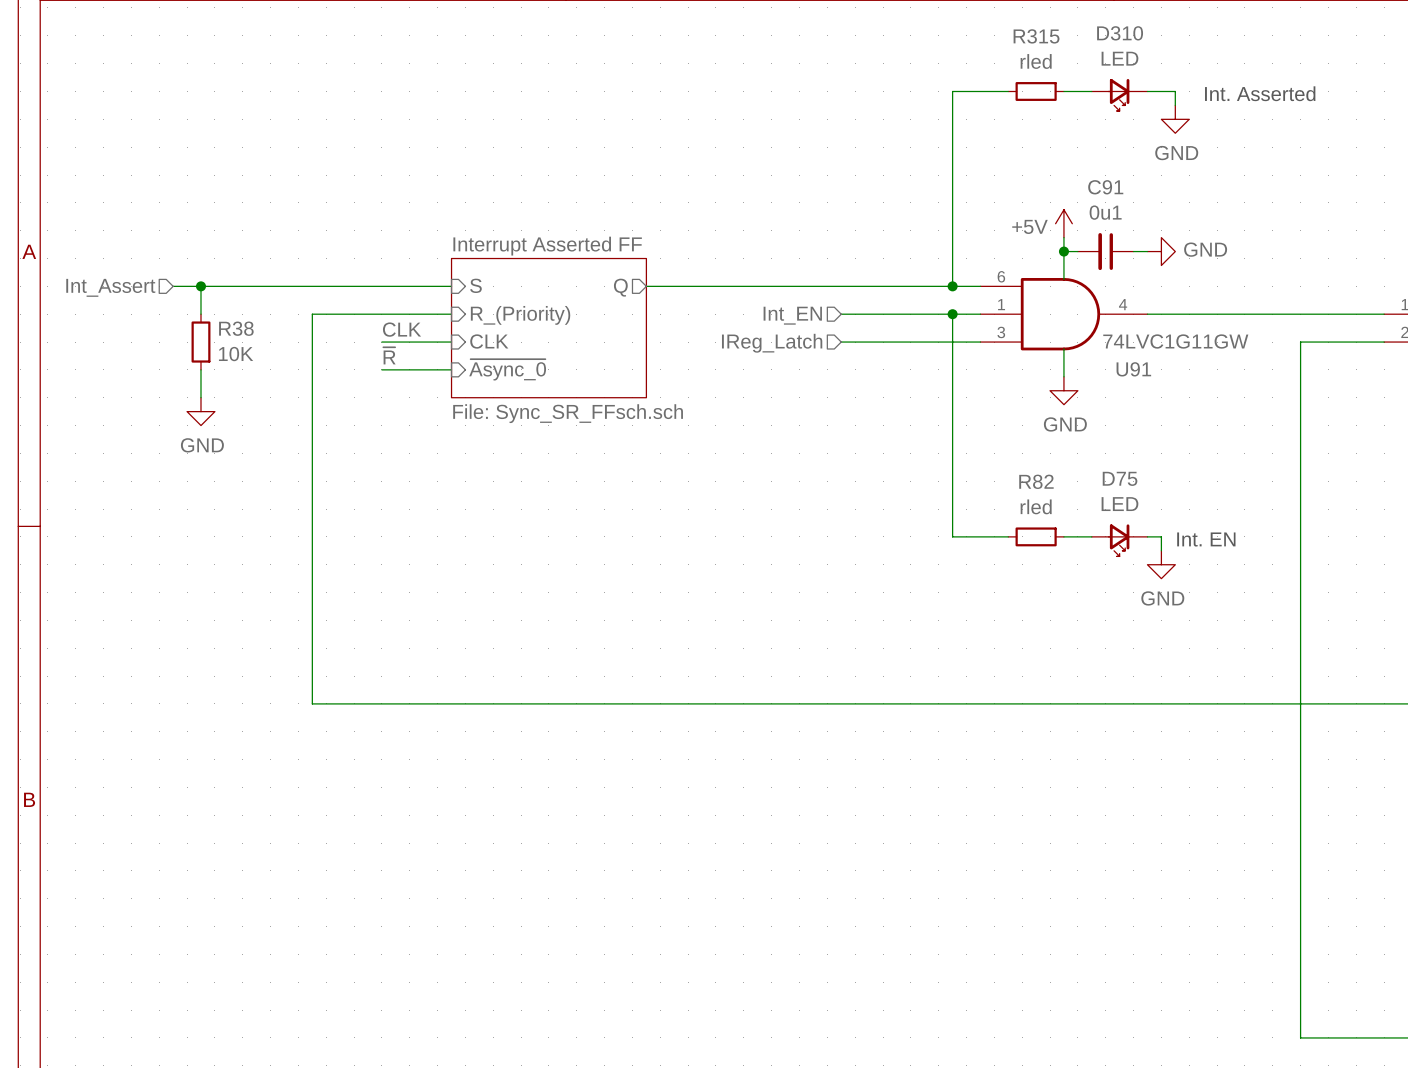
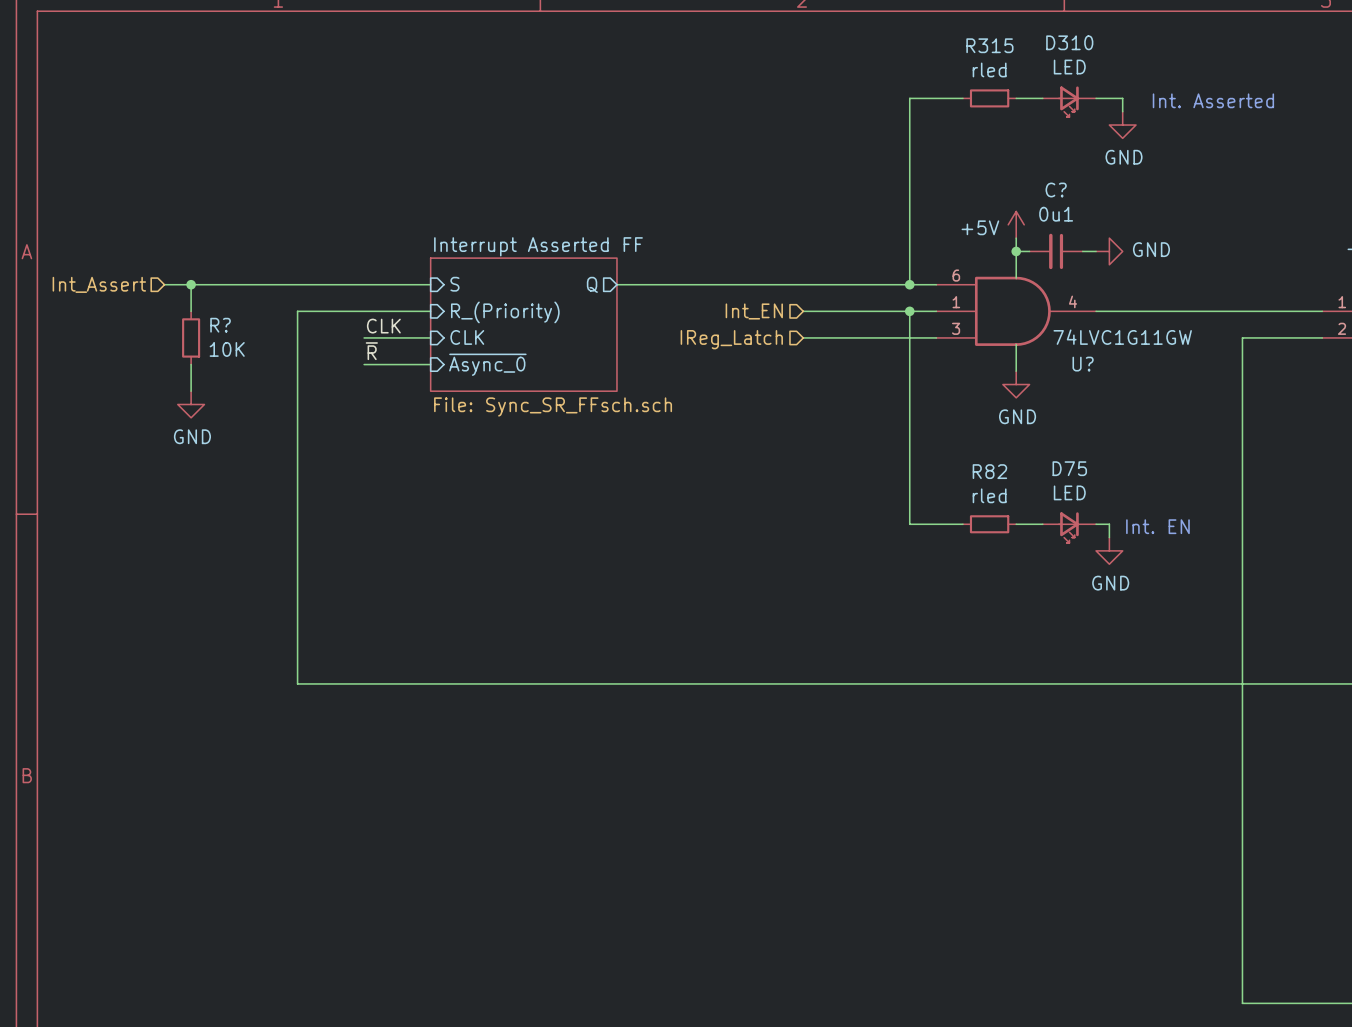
C91 name: C91 (1105, 187) -> C? (1056, 190)
R38 name: R38 (236, 328) -> R? (220, 325)
U91 name: U91 (1133, 369) -> U? (1083, 364)

